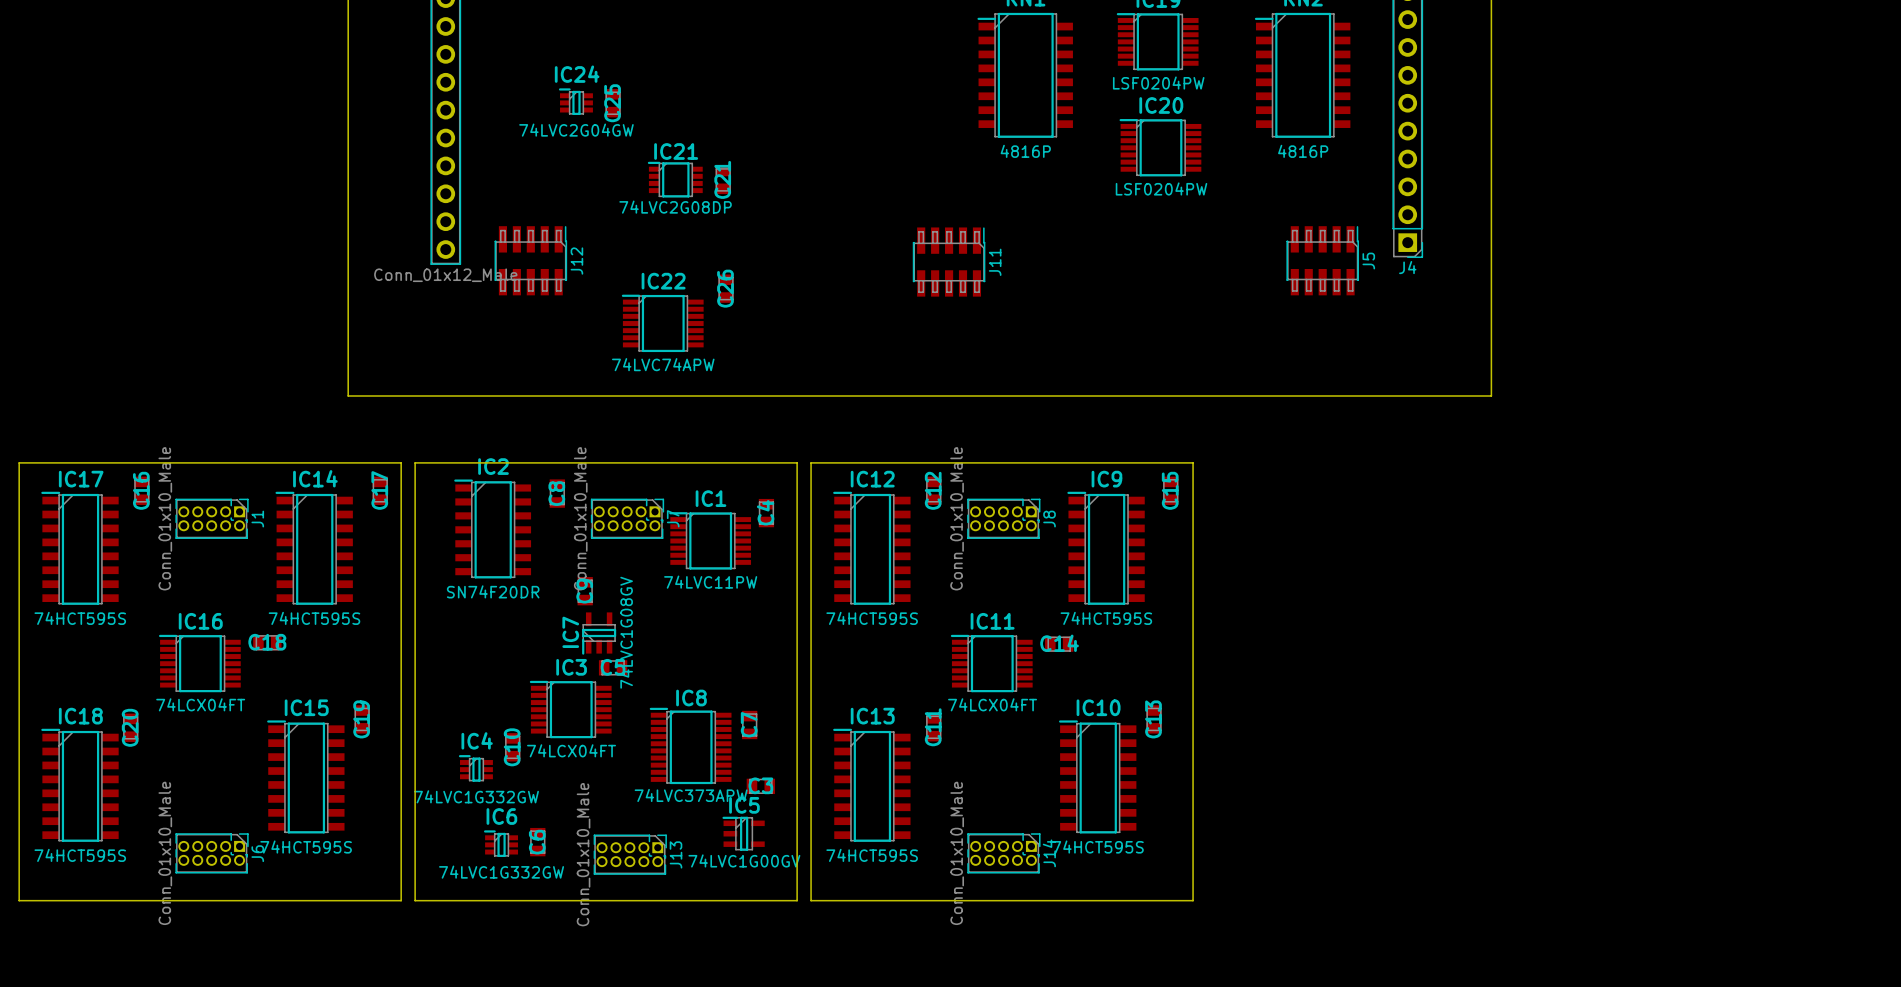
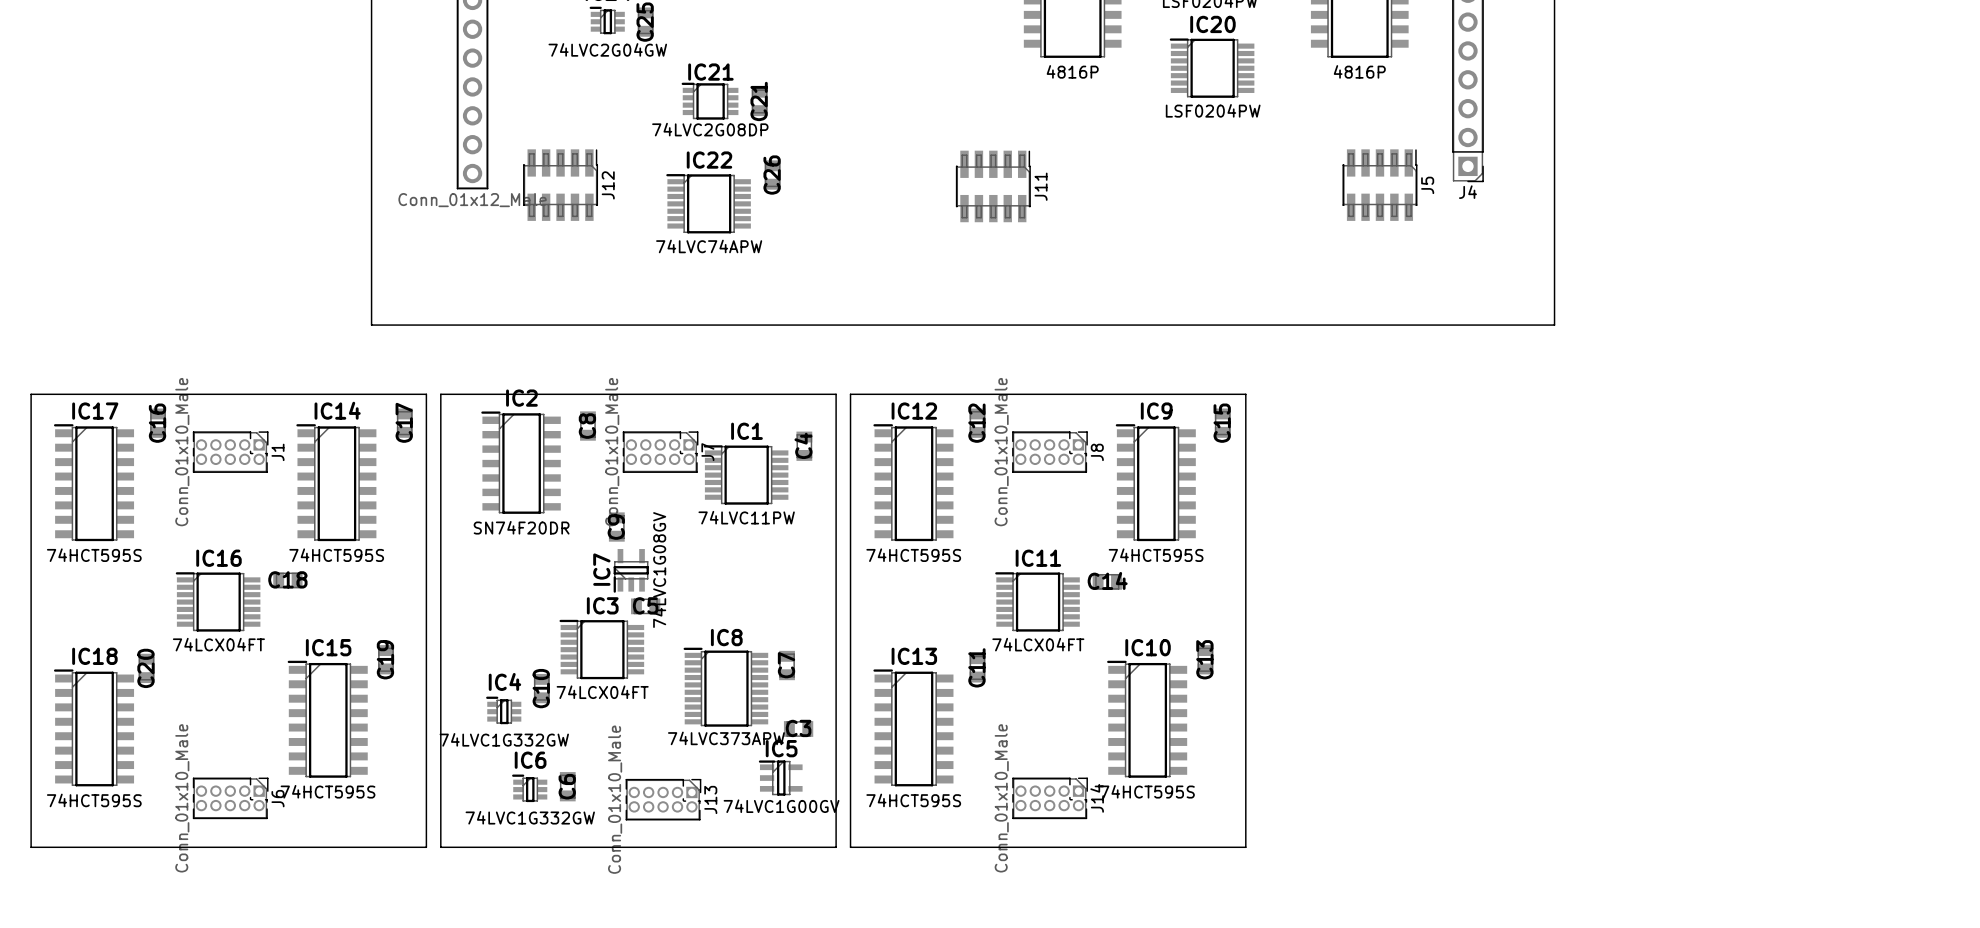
C26 position: (726, 288) -> (772, 175)
IC22 position: (662, 323) -> (708, 203)

